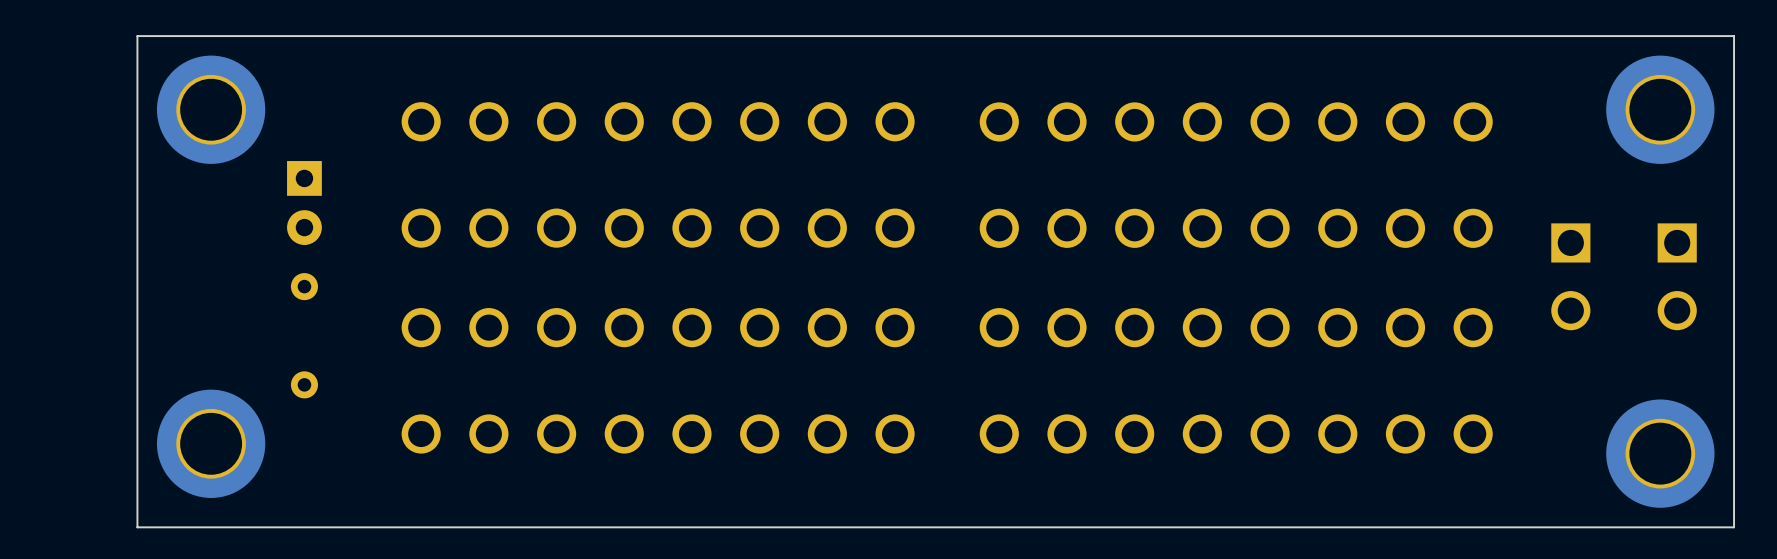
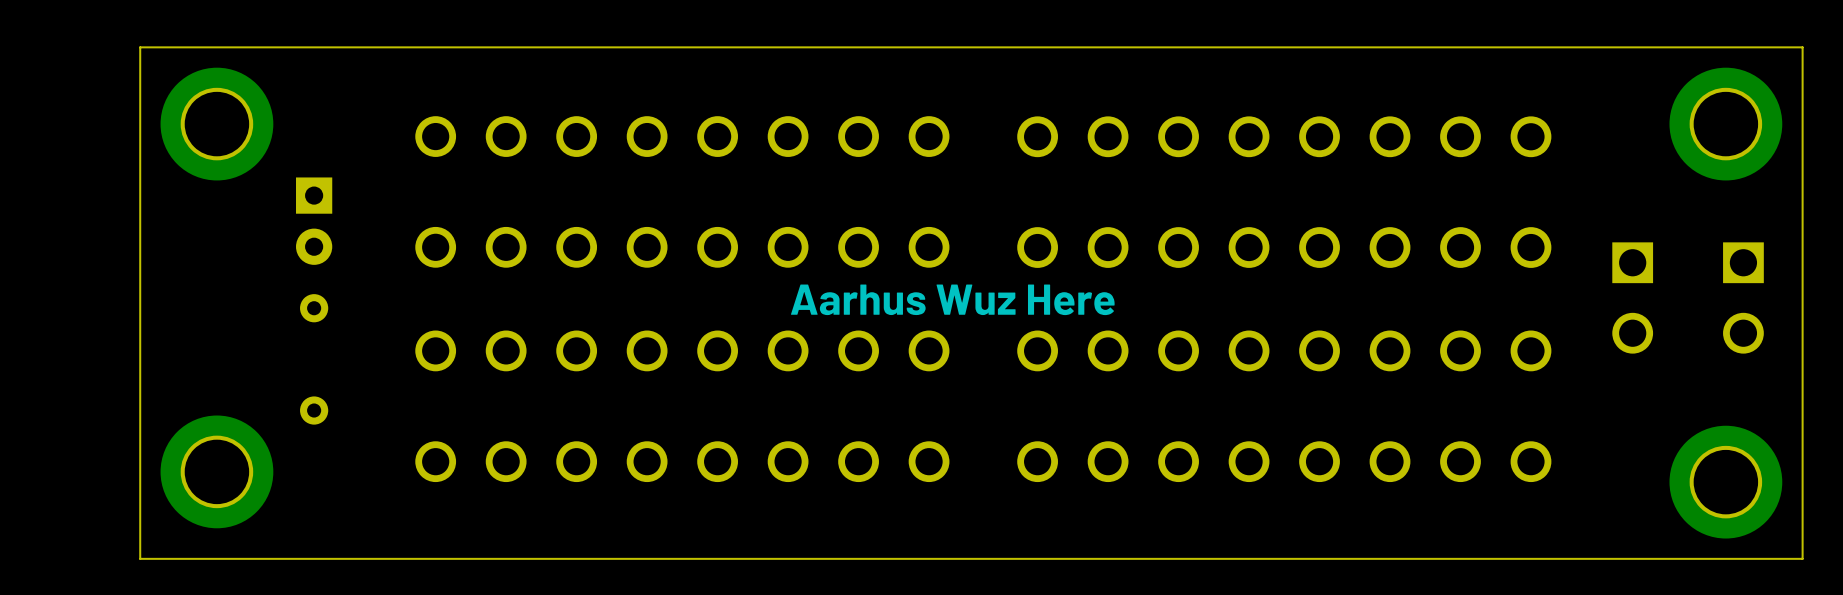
text: none -> Aarhus Wuz Here (952, 299)

